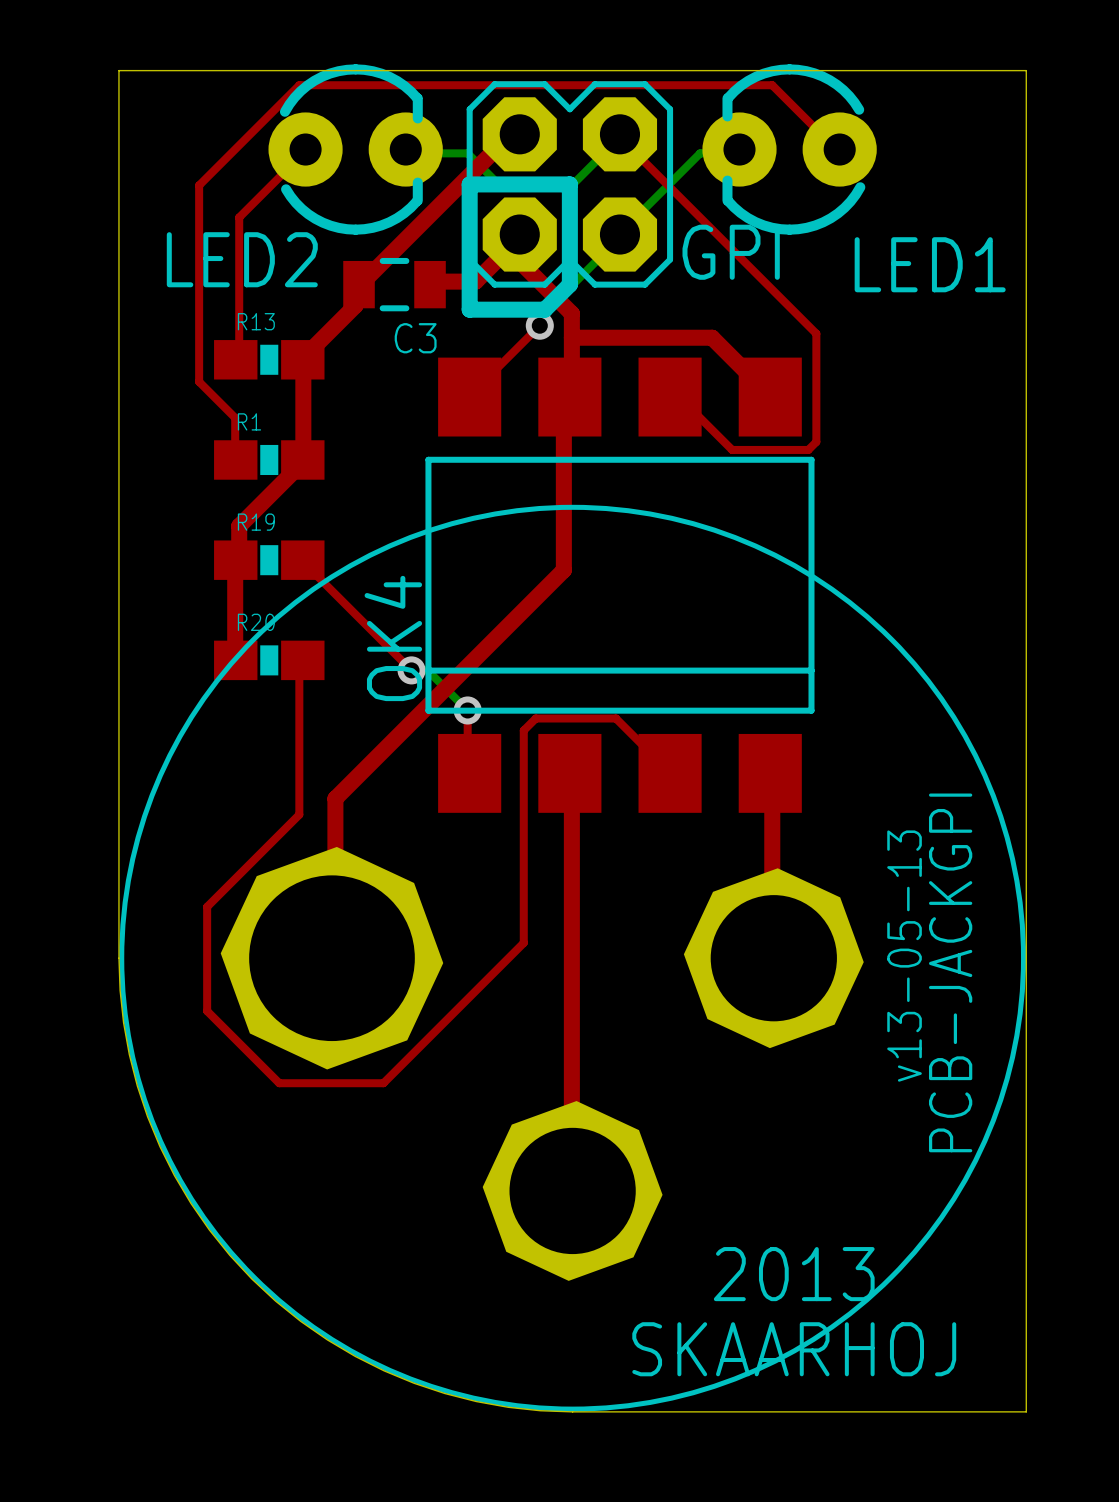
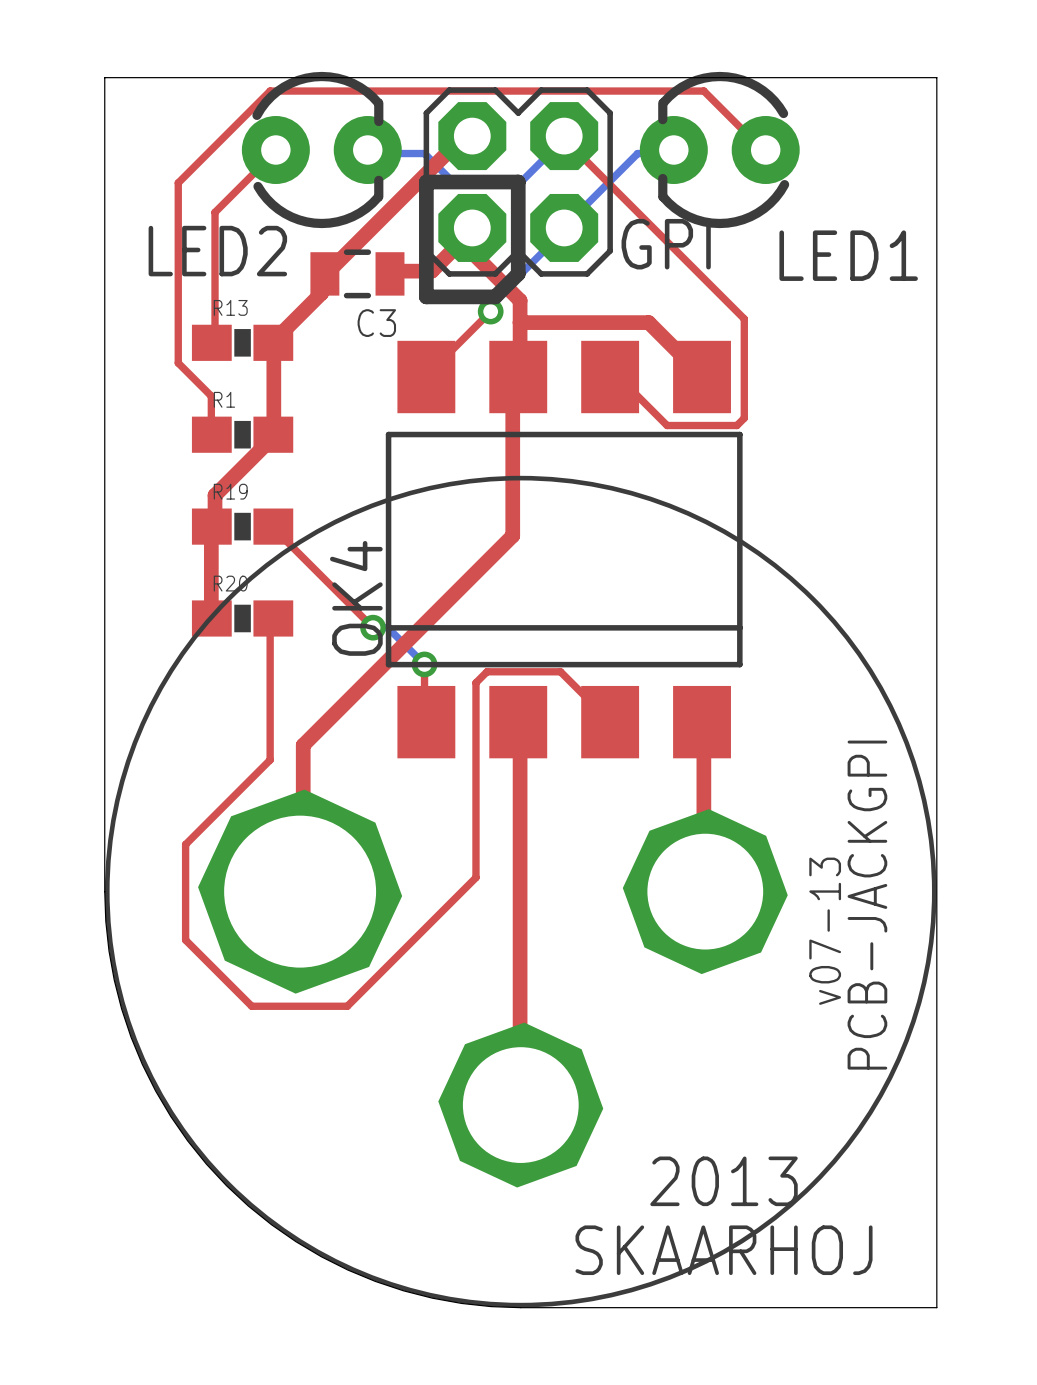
text: v13-05-13 (904, 956) -> v07-13 (825, 931)

